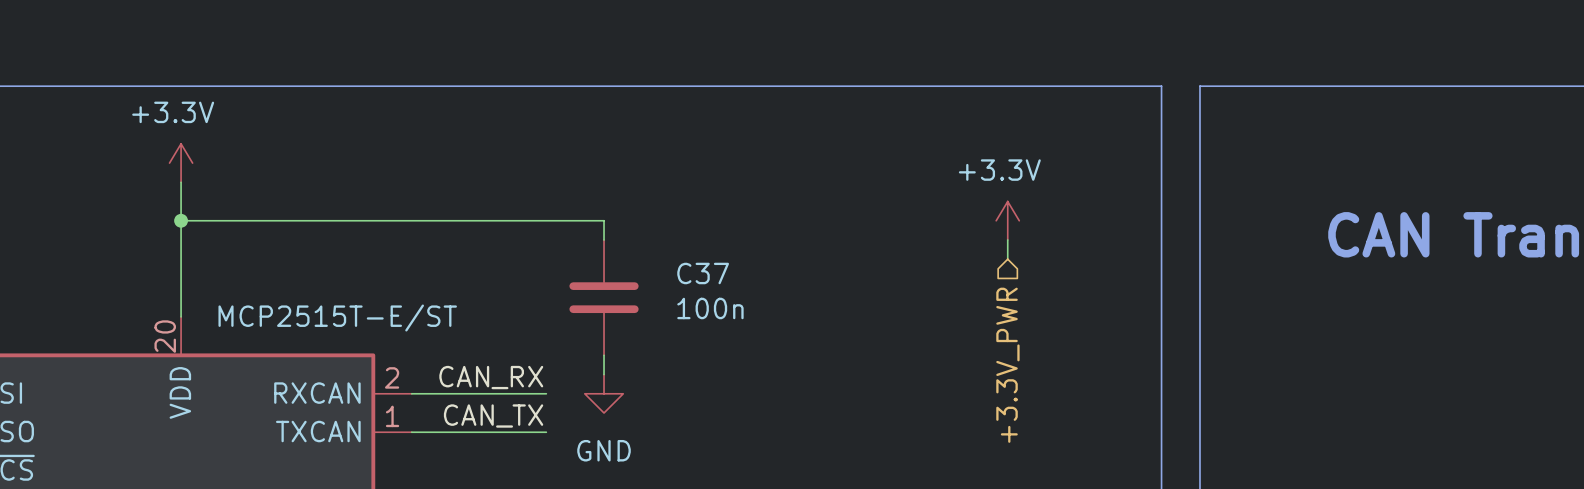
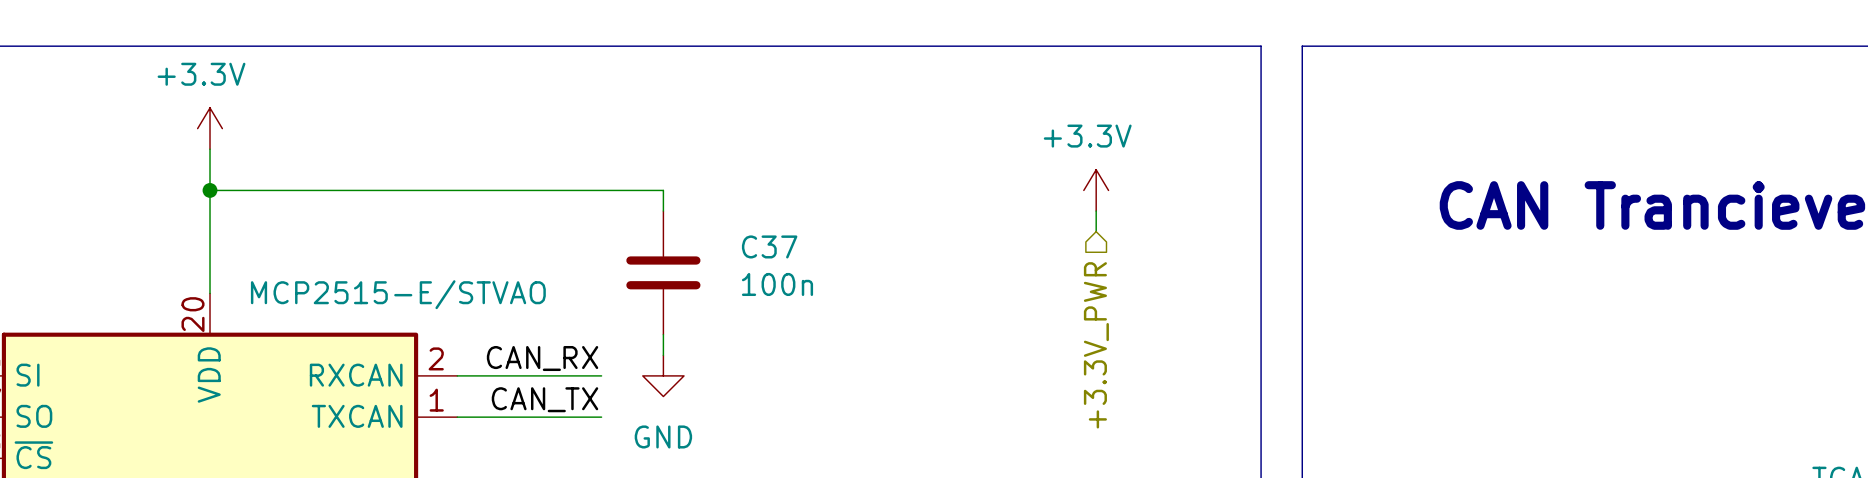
part value: MCP2515T-E/ST (337, 318) -> MCP2515-E/STVAO (398, 294)

